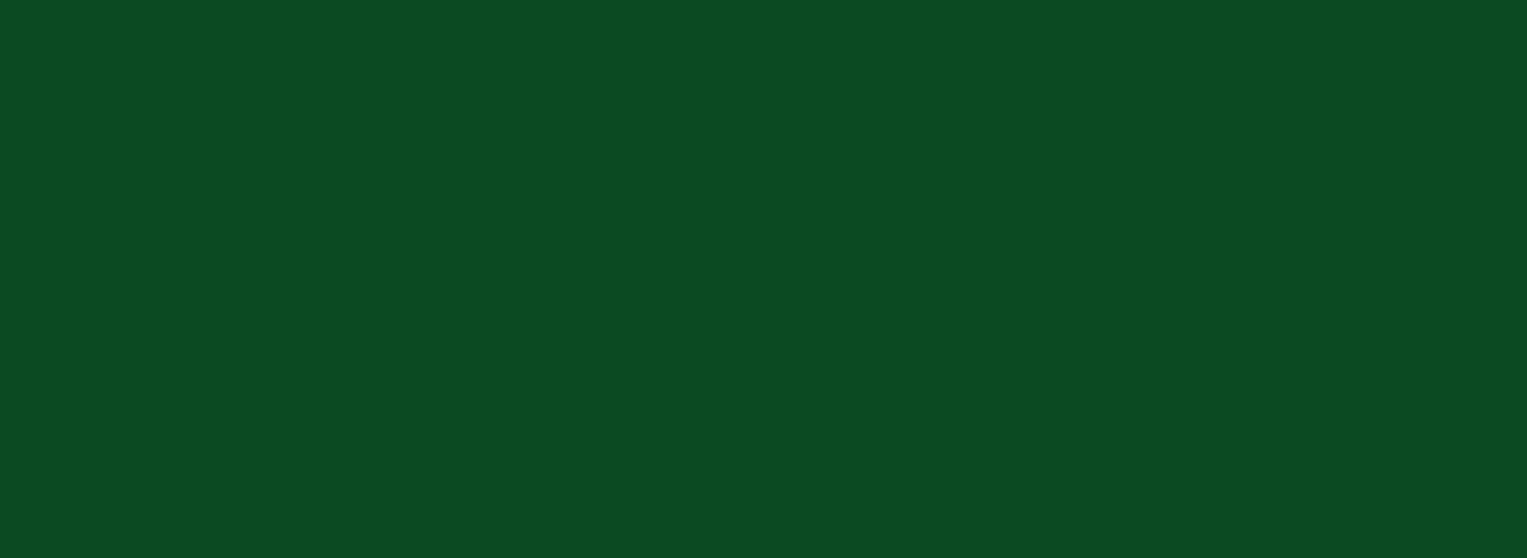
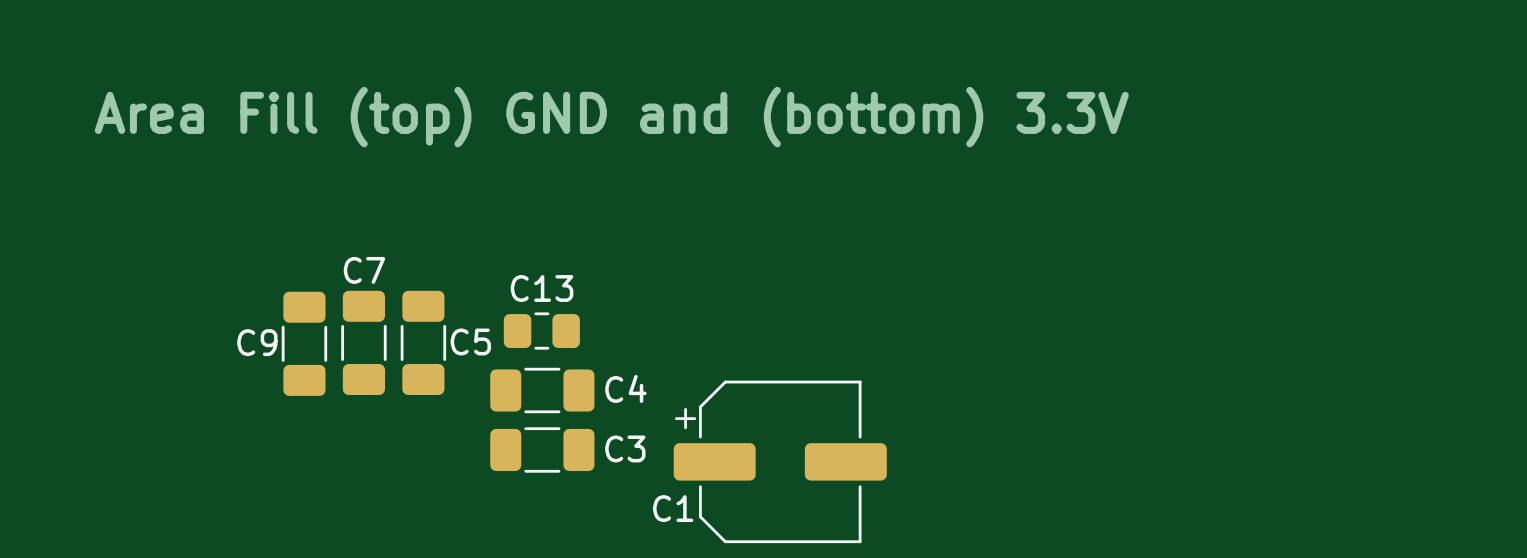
text: none -> Area Fill (top) GND and (bottom) 3.3V (611, 117)
C13: none -> (541, 331)
C7: none -> (363, 342)
C5: none -> (423, 342)
C9: none -> (304, 343)
C4: none -> (542, 390)
C3: none -> (542, 449)
C1: none -> (780, 461)

